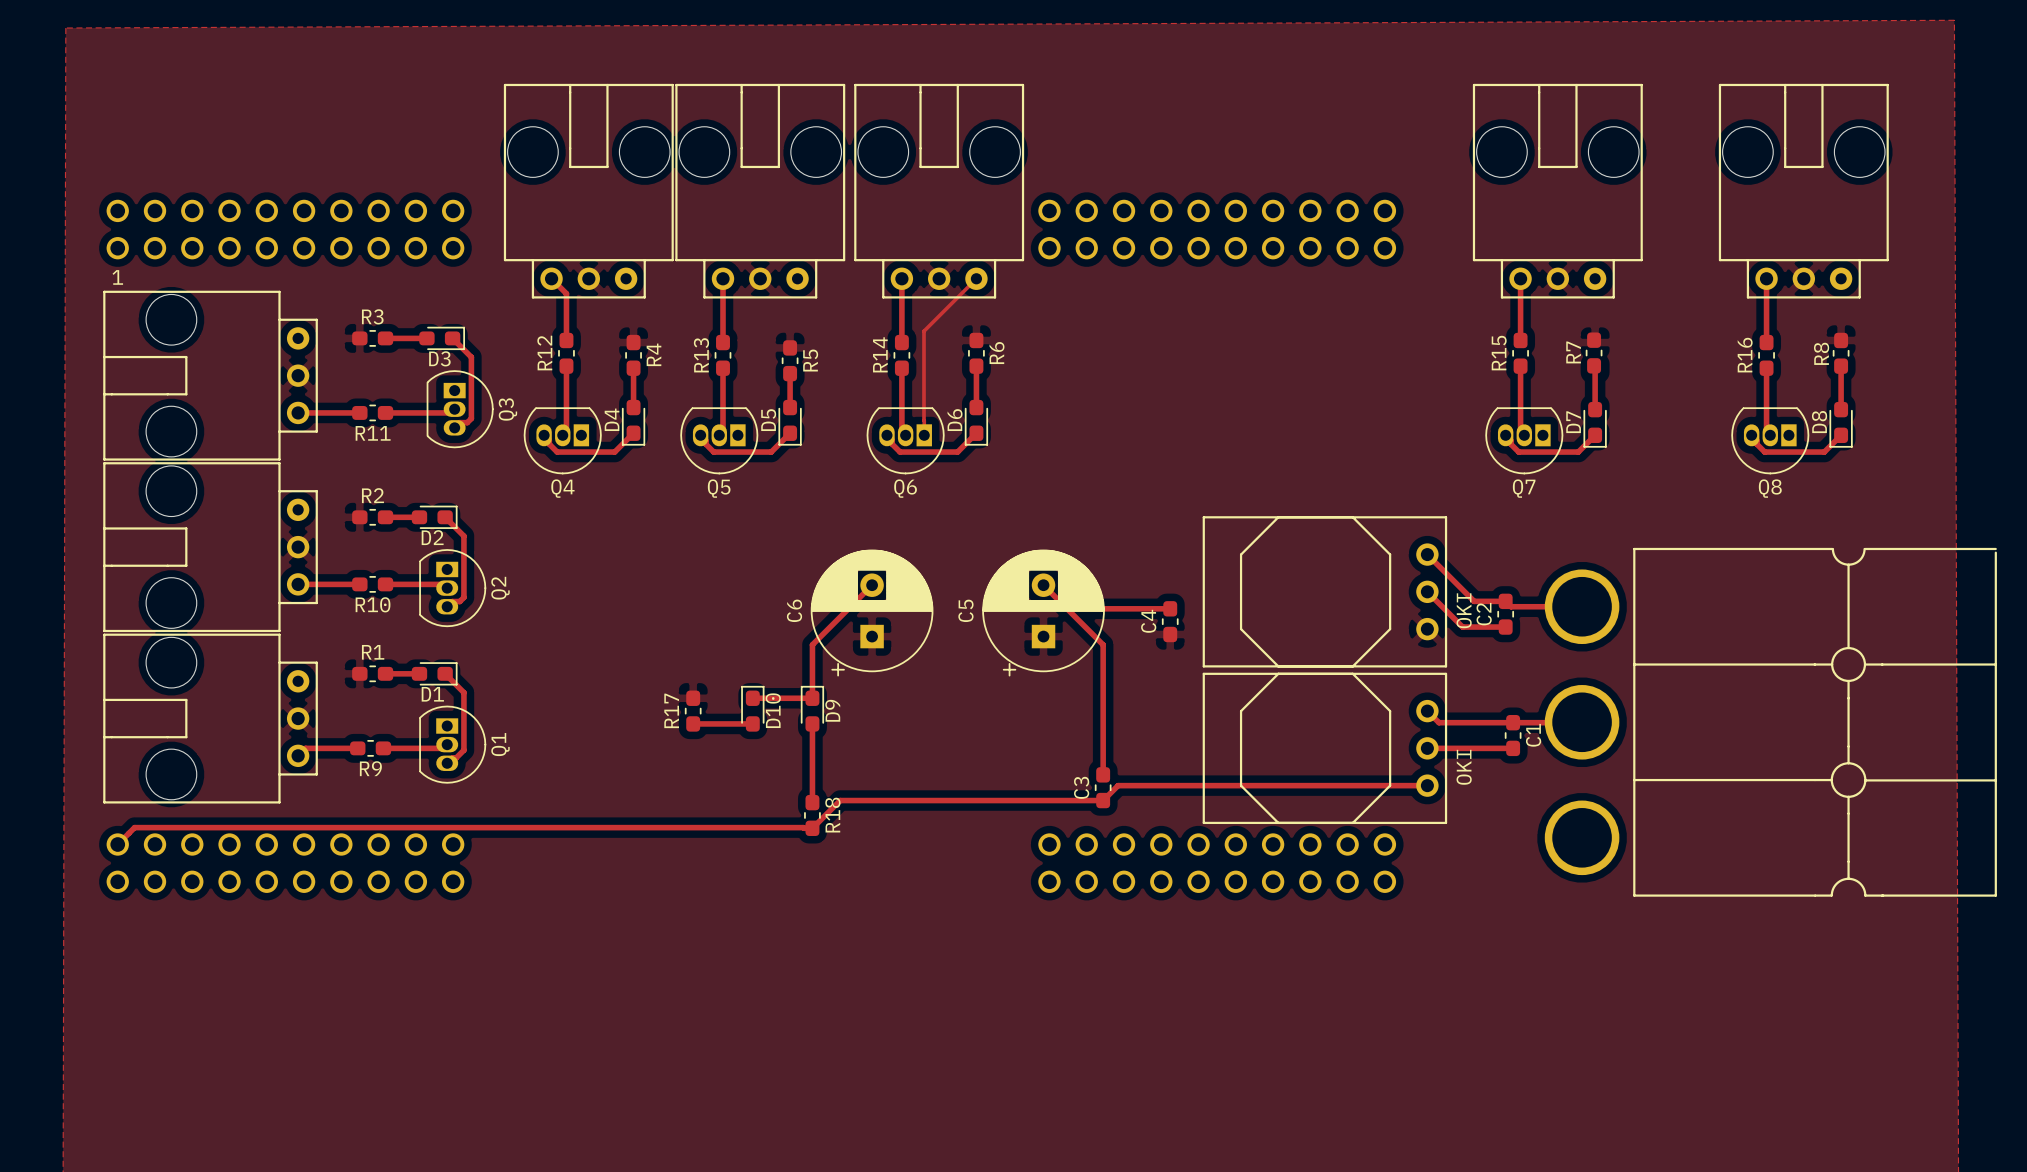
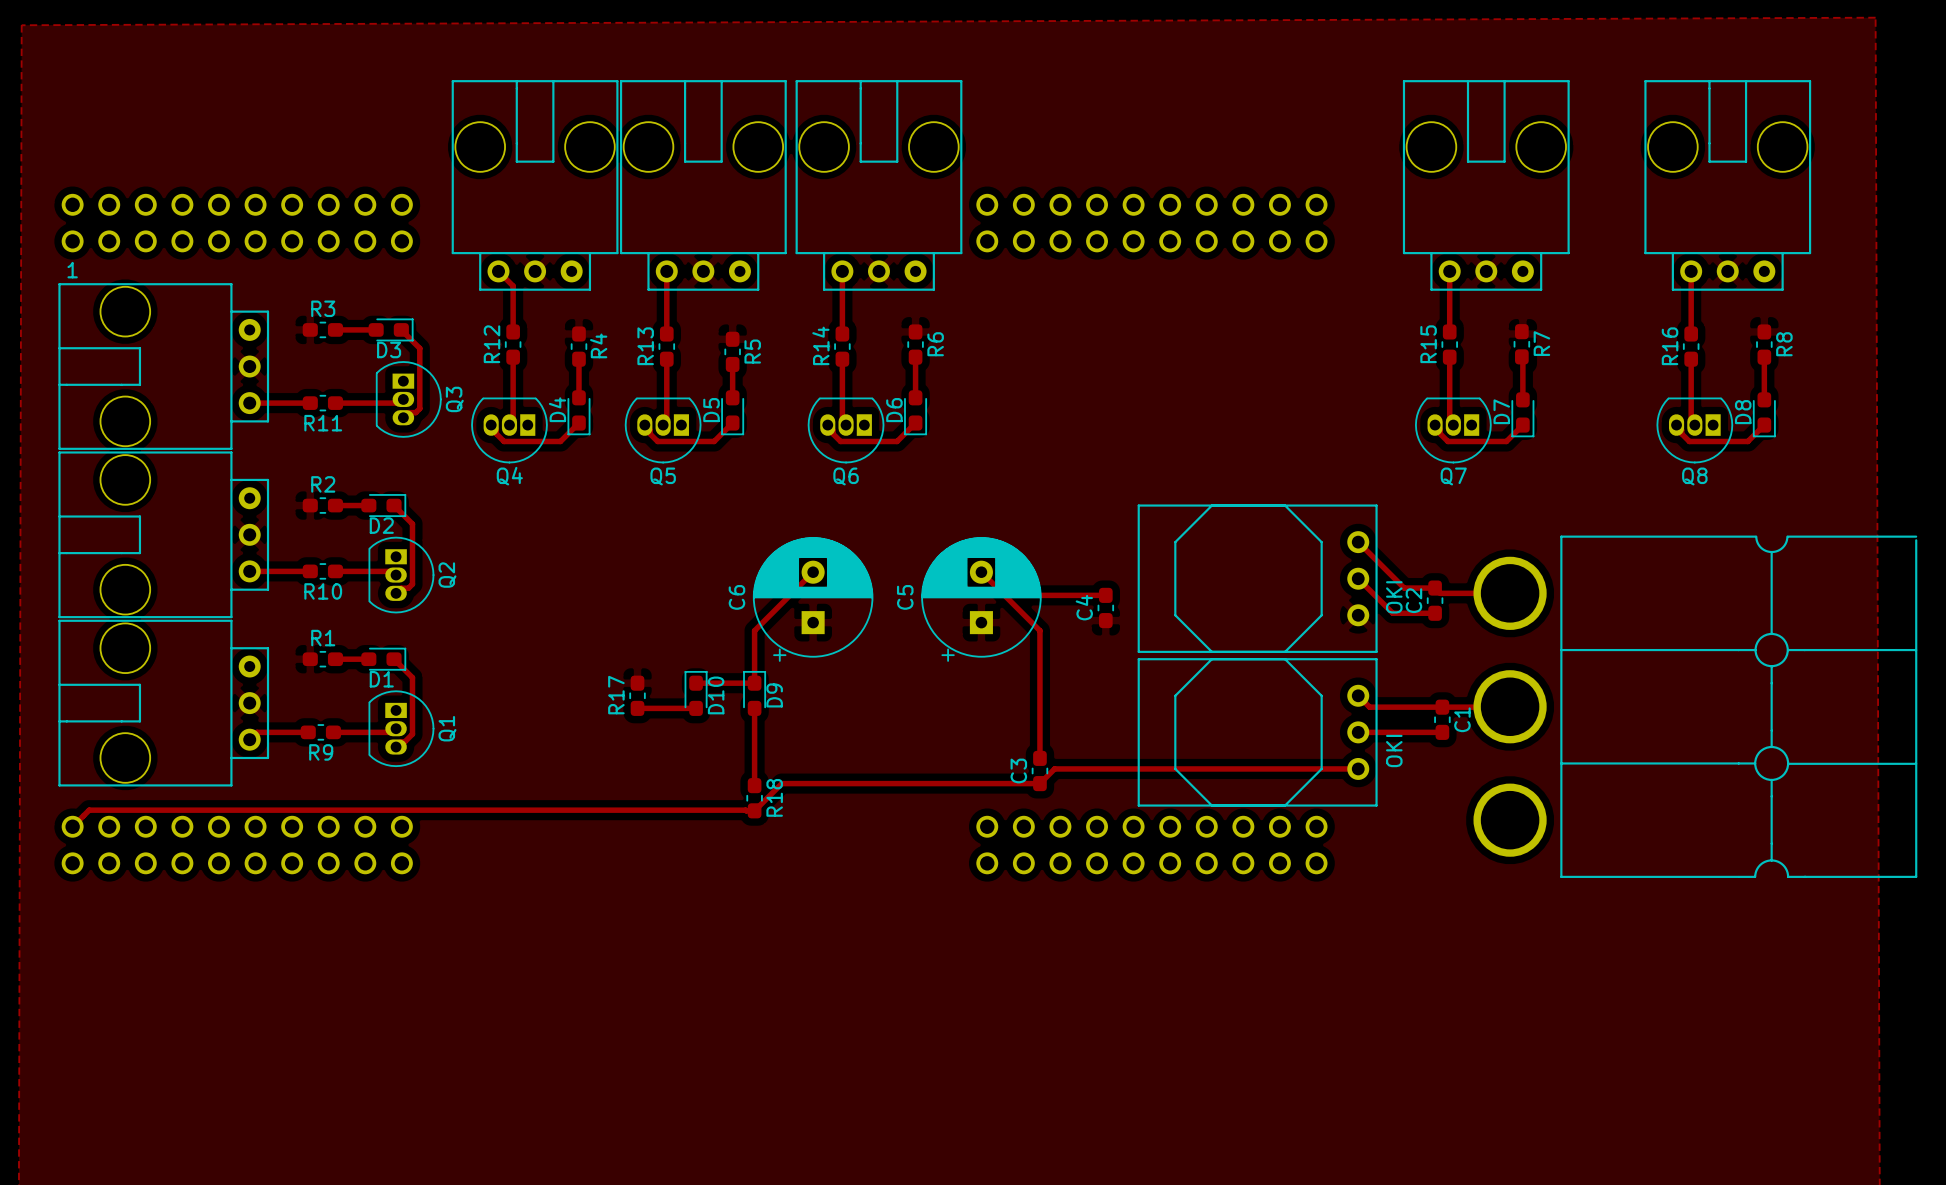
track: (976, 278) (924, 331) (924, 435) -> none
R7 name position: R7 (1573, 352) -> R7 (1541, 343)
R8 name position: R8 (1821, 353) -> R8 (1784, 344)

